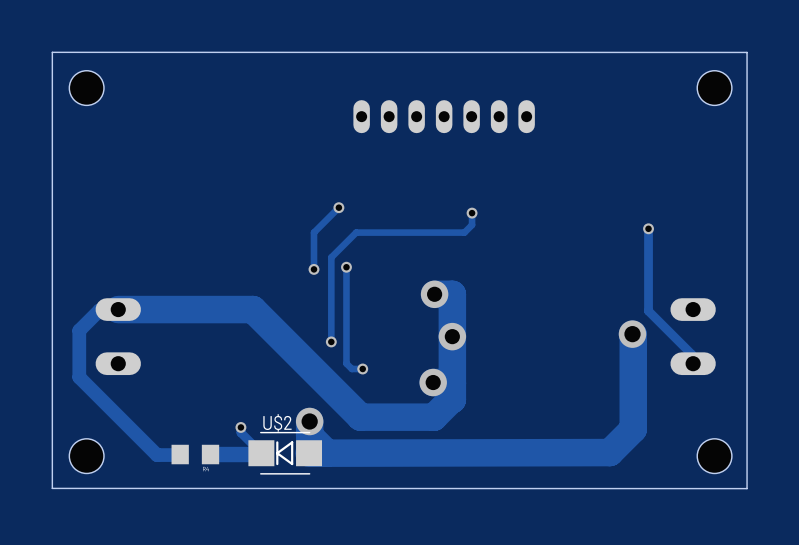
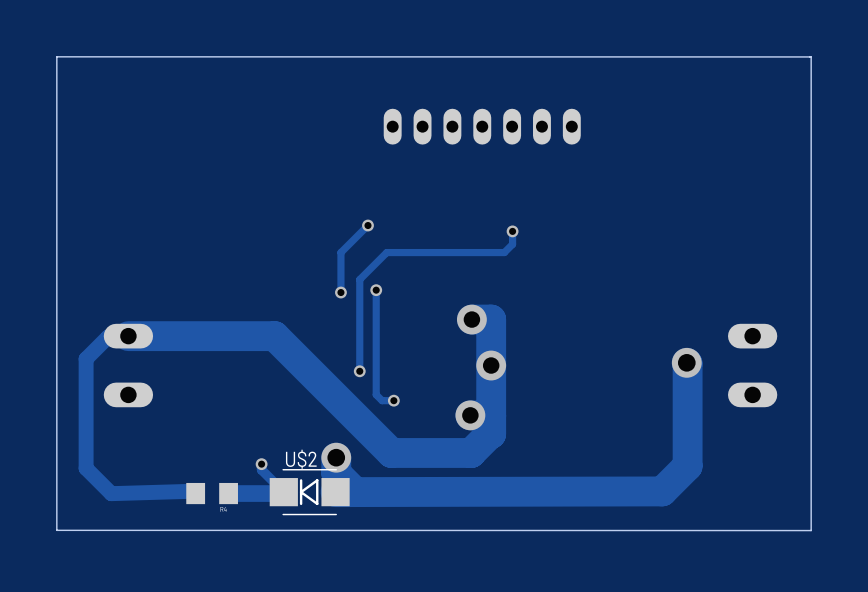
hole: (86, 88) -> none
hole: (714, 88) -> none
track: (648, 228) (648, 311) (691, 354) (693, 363) -> none
via: (648, 228) -> none
track: (79, 377) (157, 455) (180, 454) -> (86, 409) (86, 468) (111, 493) (195, 491)
hole: (86, 456) -> none
hole: (714, 456) -> none

